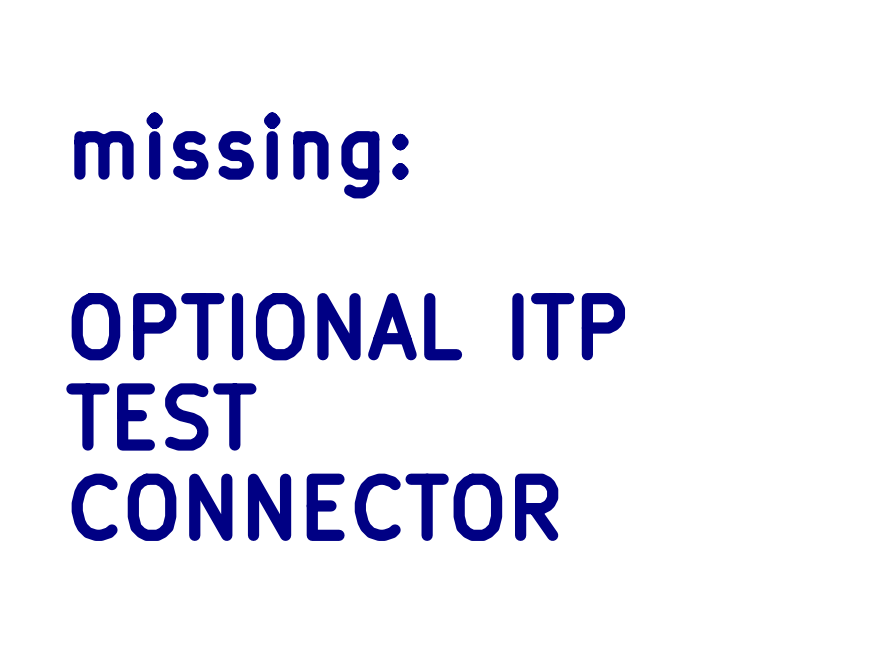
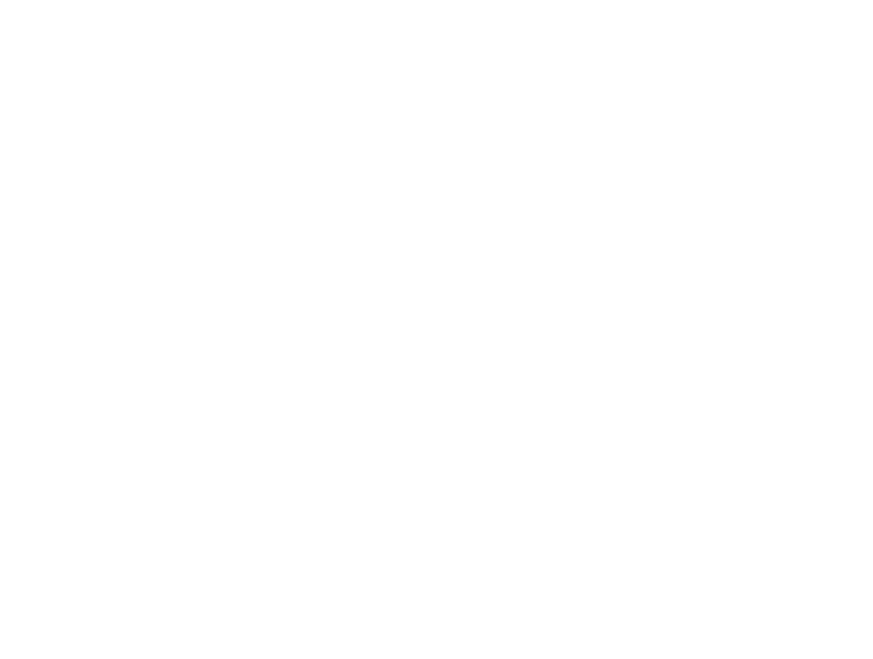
text: missing: (241, 155) -> none
text: OPTIONAL ITP (348, 326) -> none
text: TEST (161, 416) -> none
text: CONNECTOR (314, 507) -> none

